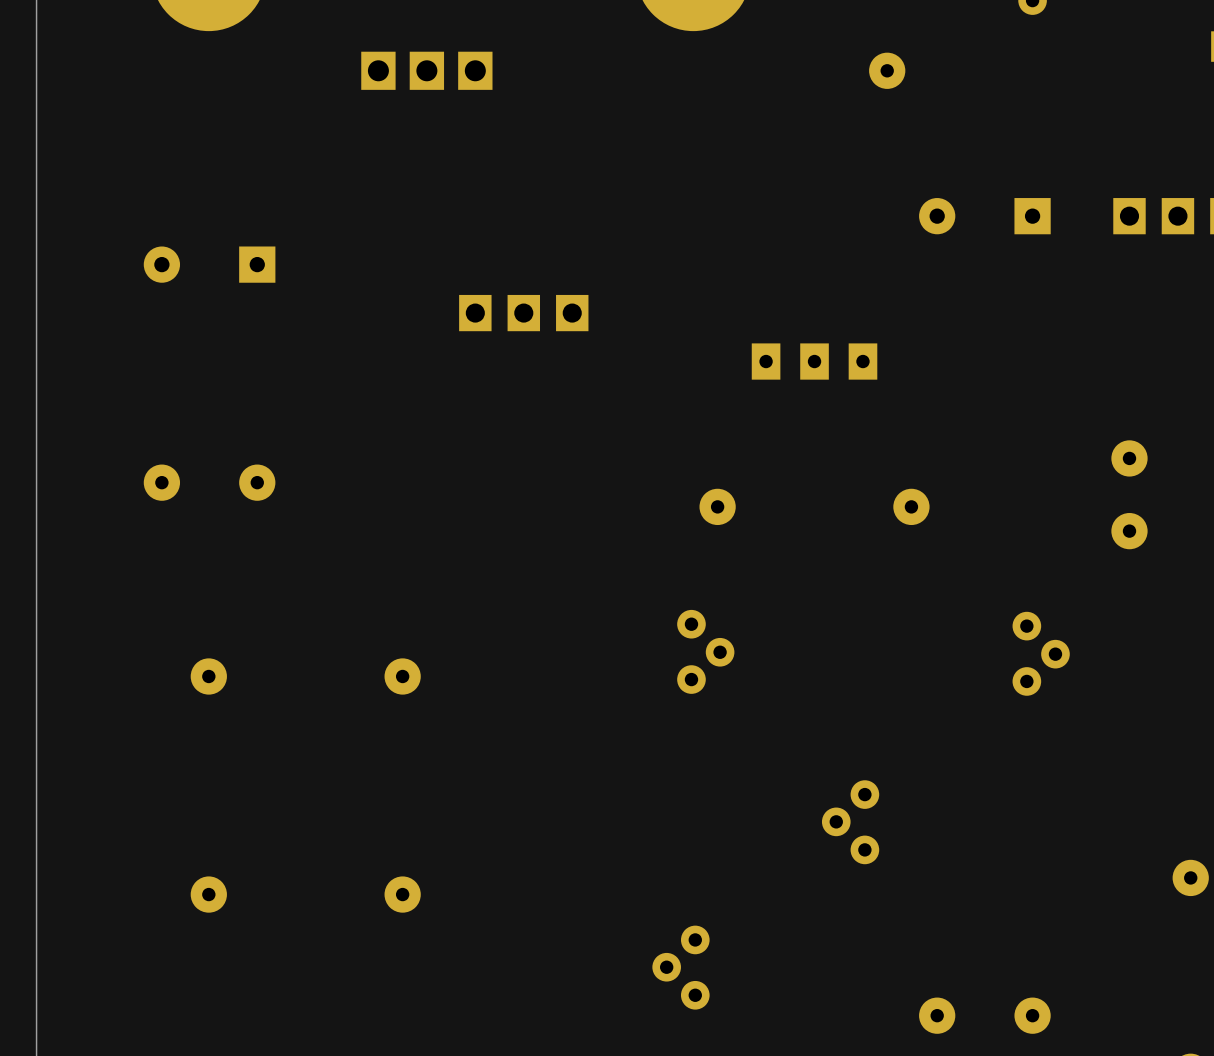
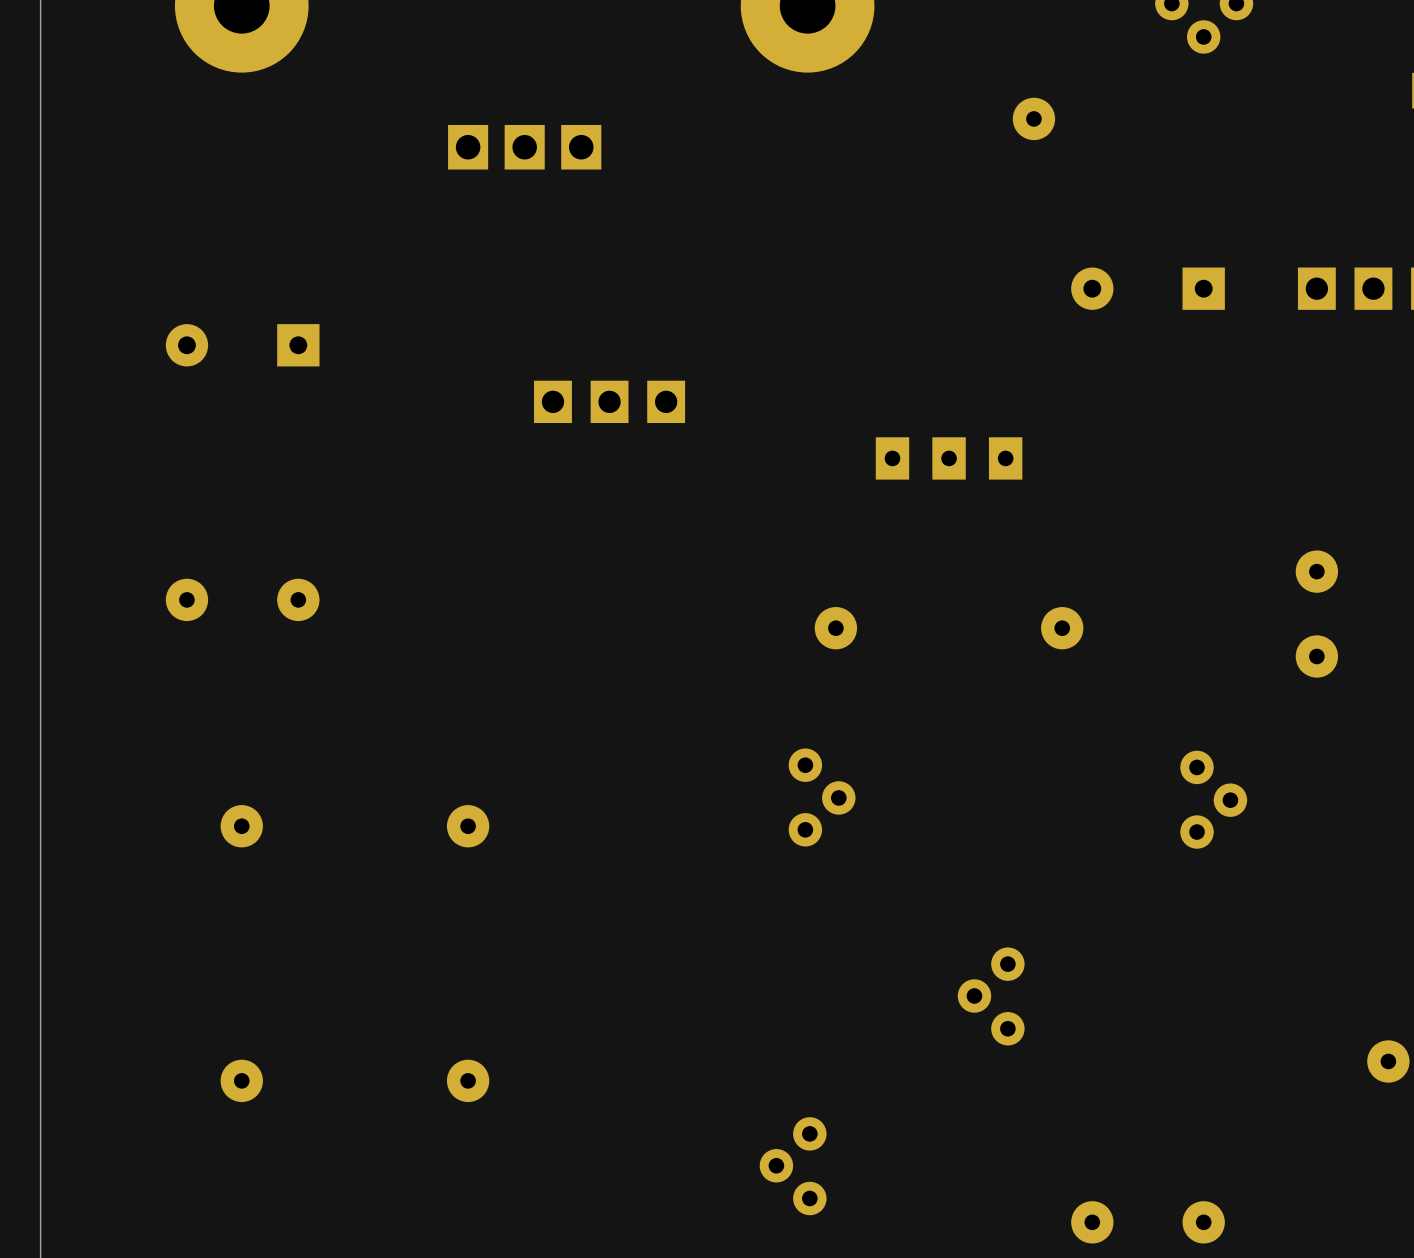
part position: (426, 70) -> (524, 147)

